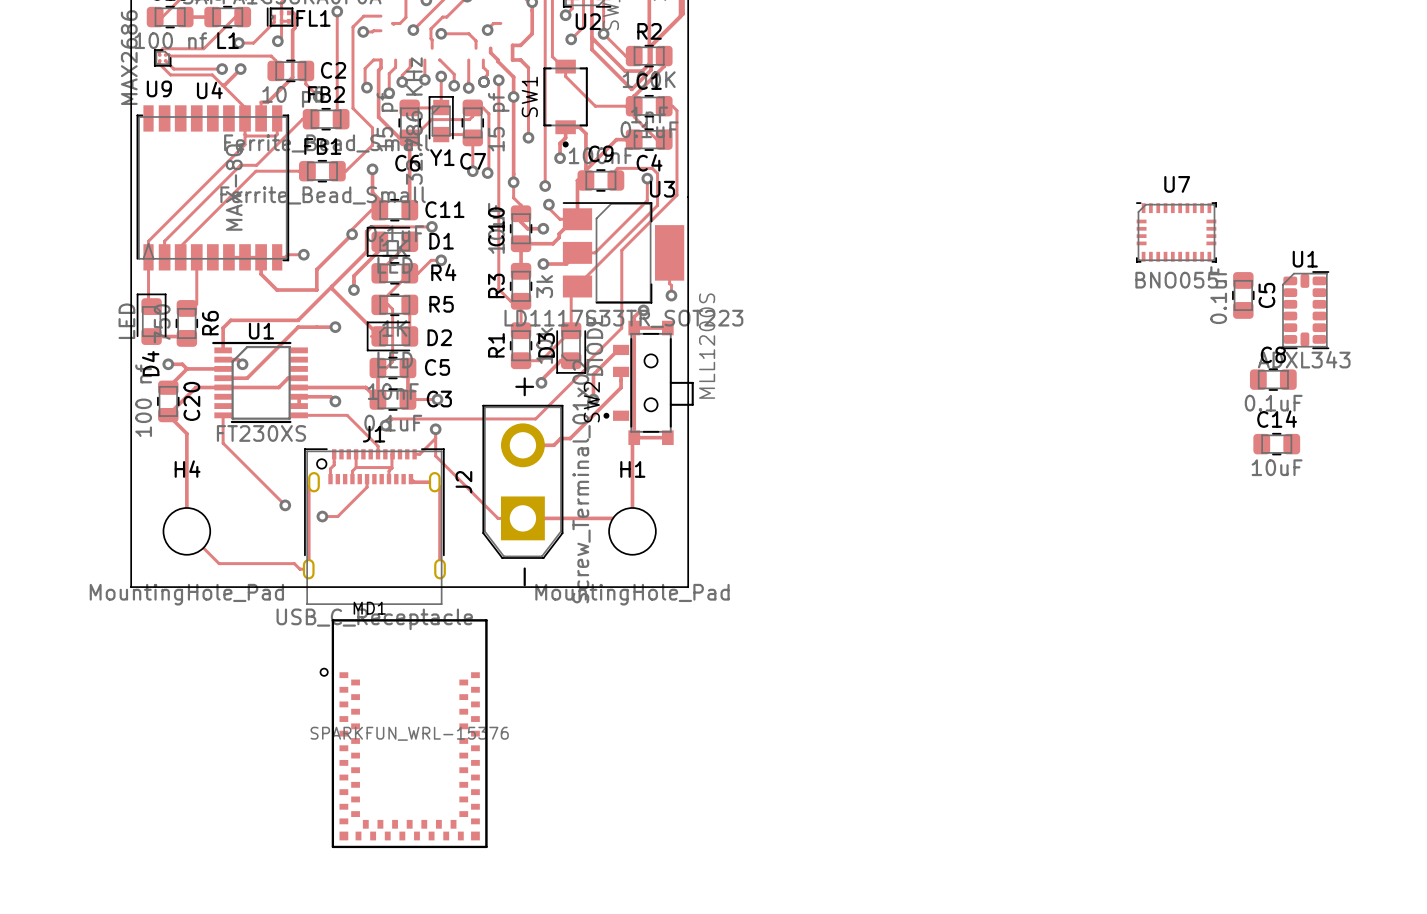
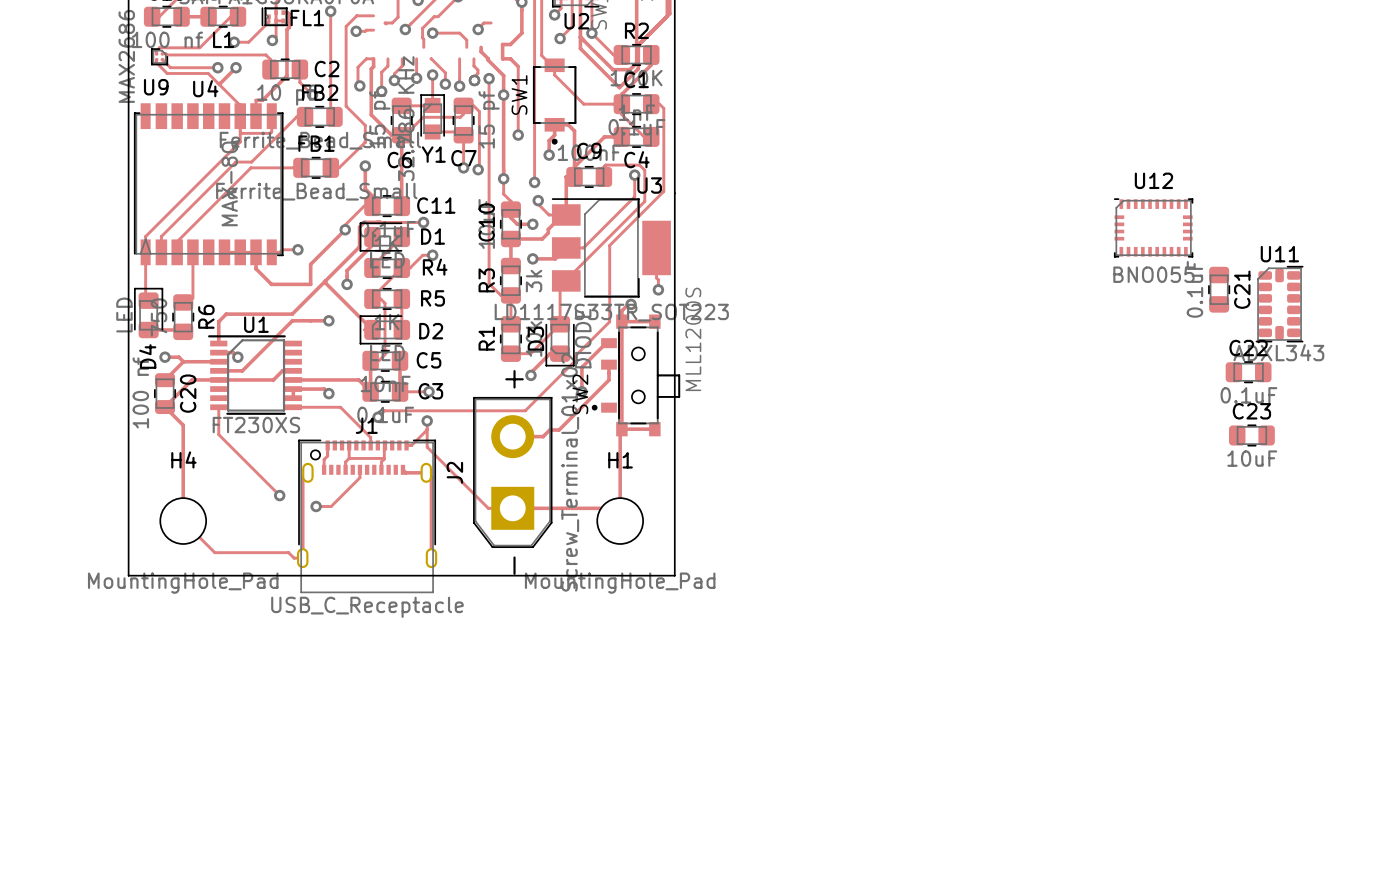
U7 name: U7 (1177, 184) -> U12 (1153, 180)
U1 name: U1 (1305, 259) -> U11 (1279, 254)
C5 name: C5 (1266, 295) -> C21 (1242, 289)
C8 name: C8 (1273, 354) -> C22 (1248, 348)
C14 name: C14 (1277, 419) -> C23 (1251, 411)
MD1: SPARKFUN_WRL-15376 (403, 733) -> none

